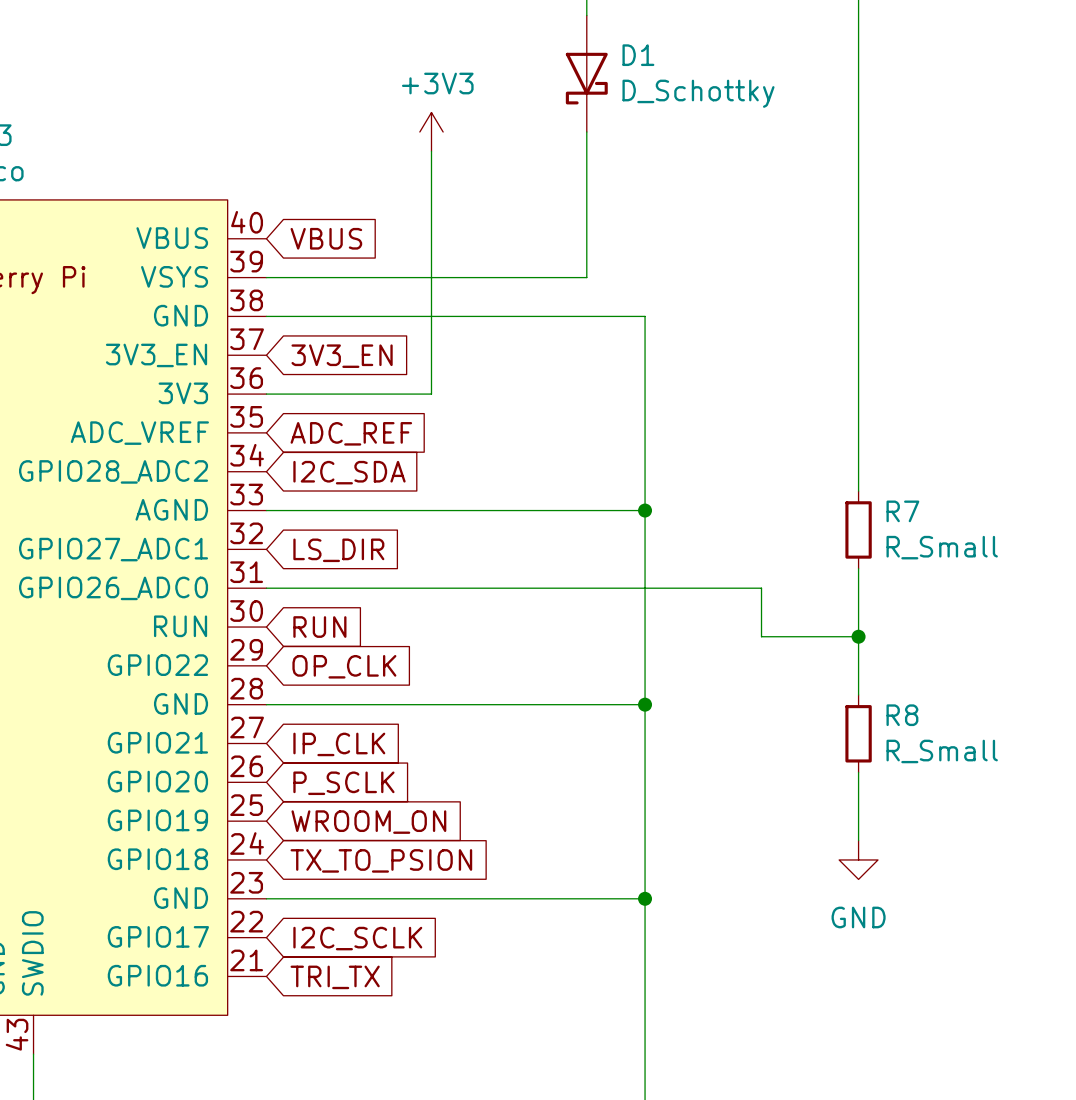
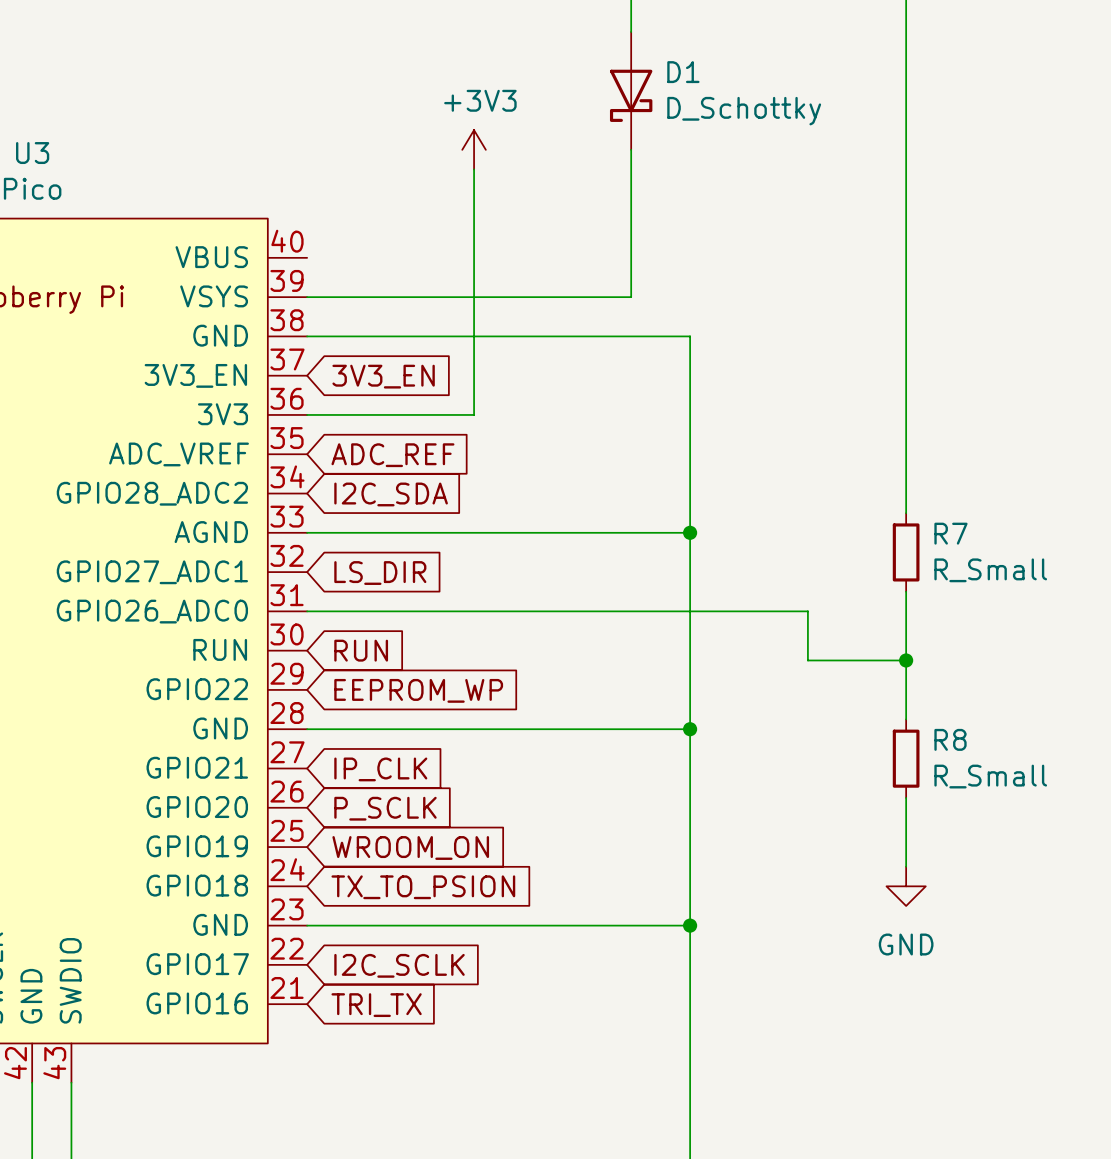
global label: VBUS (326, 238) -> none
global label: OP_CLK (344, 666) -> EEPROM_WP (418, 690)

